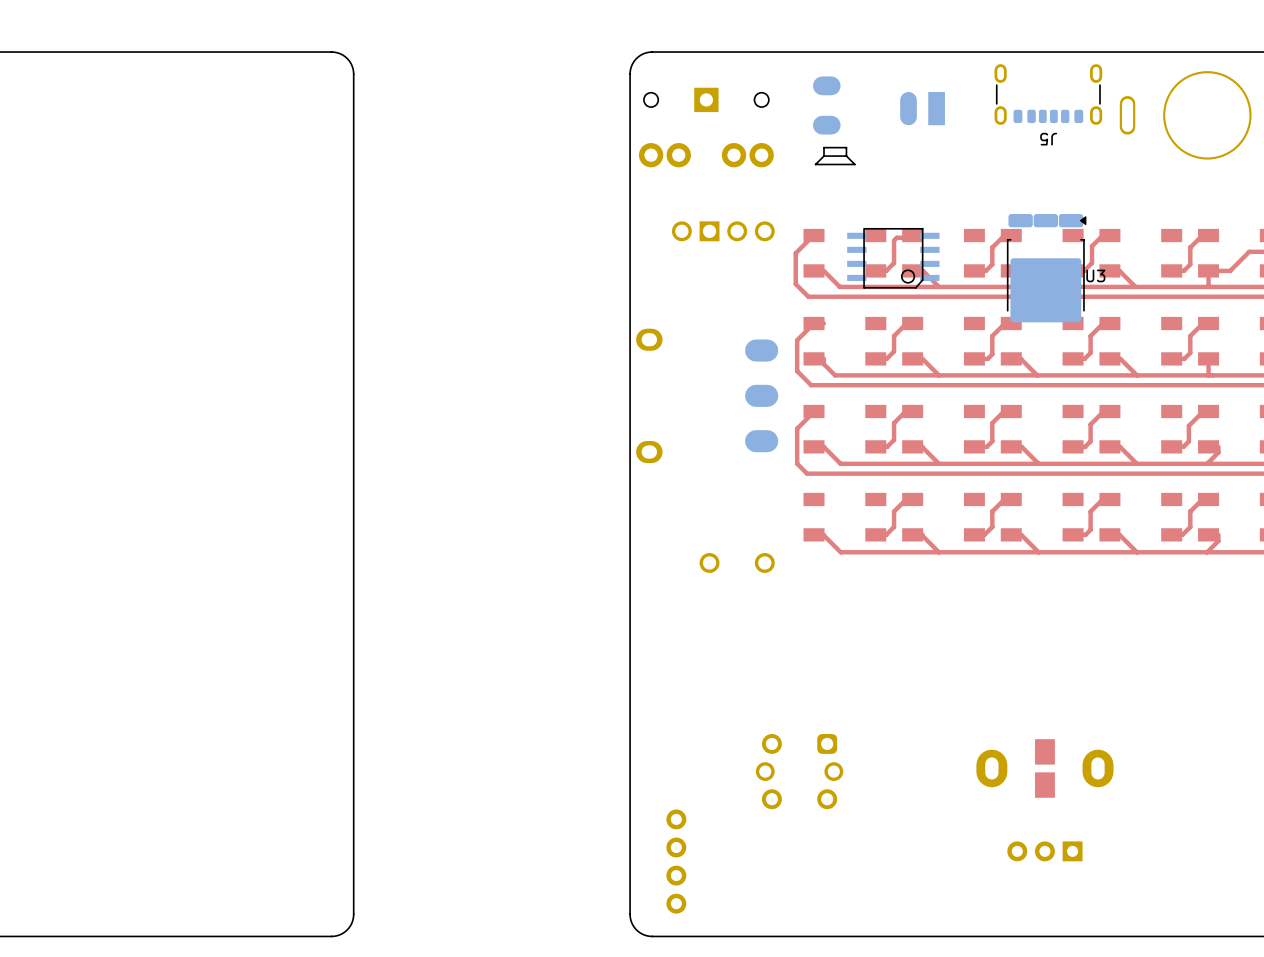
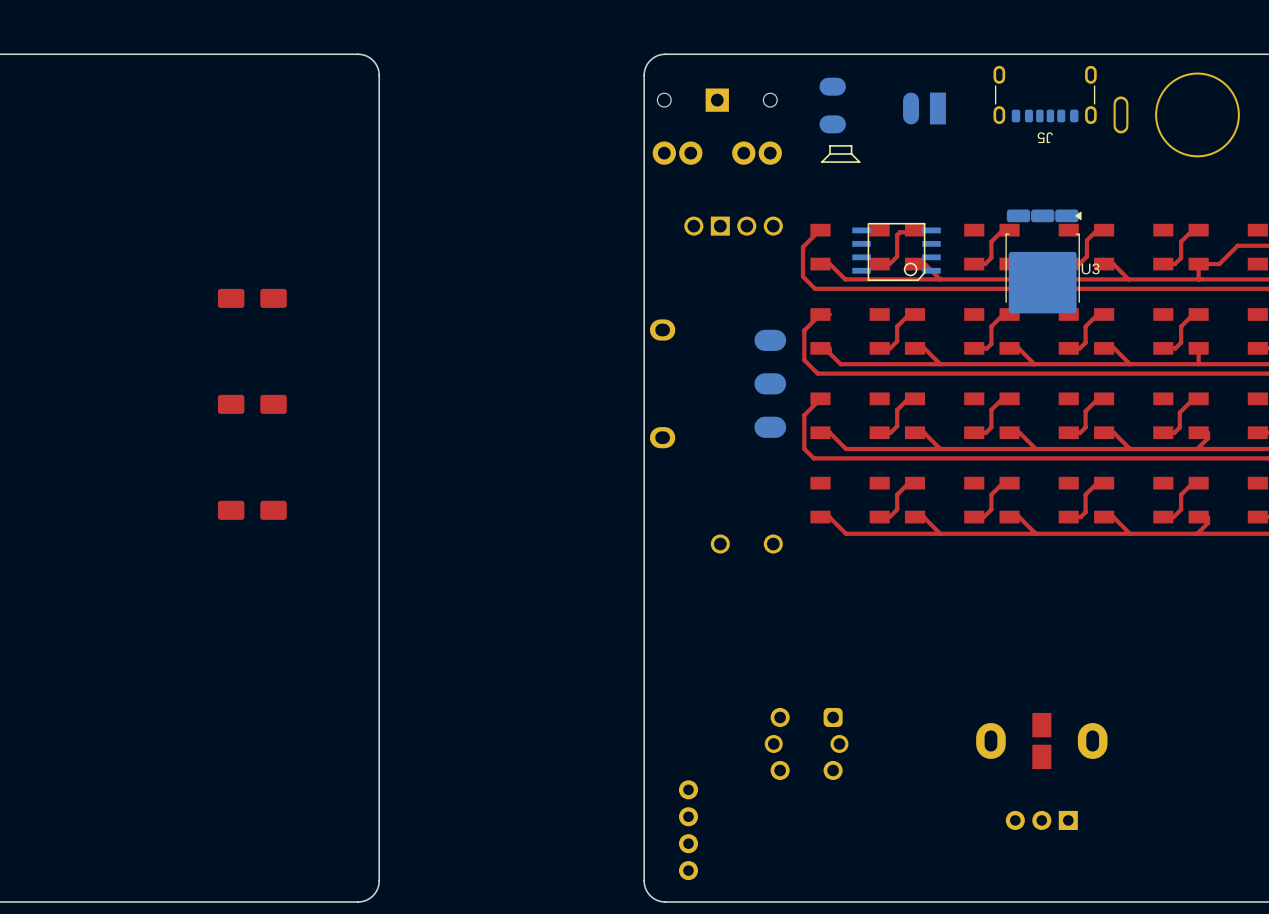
part: none -> (252, 298)
part: none -> (252, 404)
part: none -> (252, 510)

